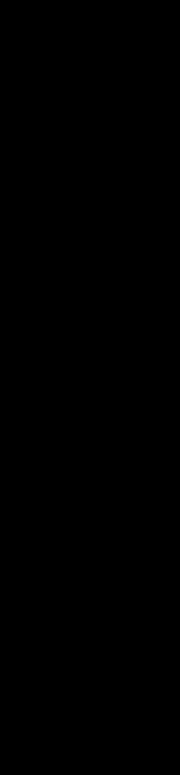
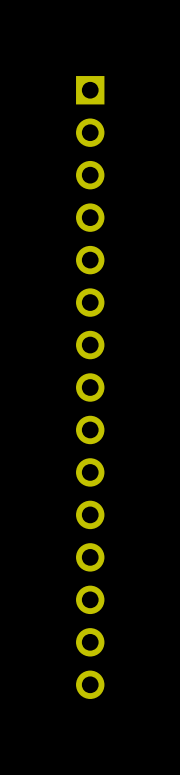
part: none -> (90, 387)

